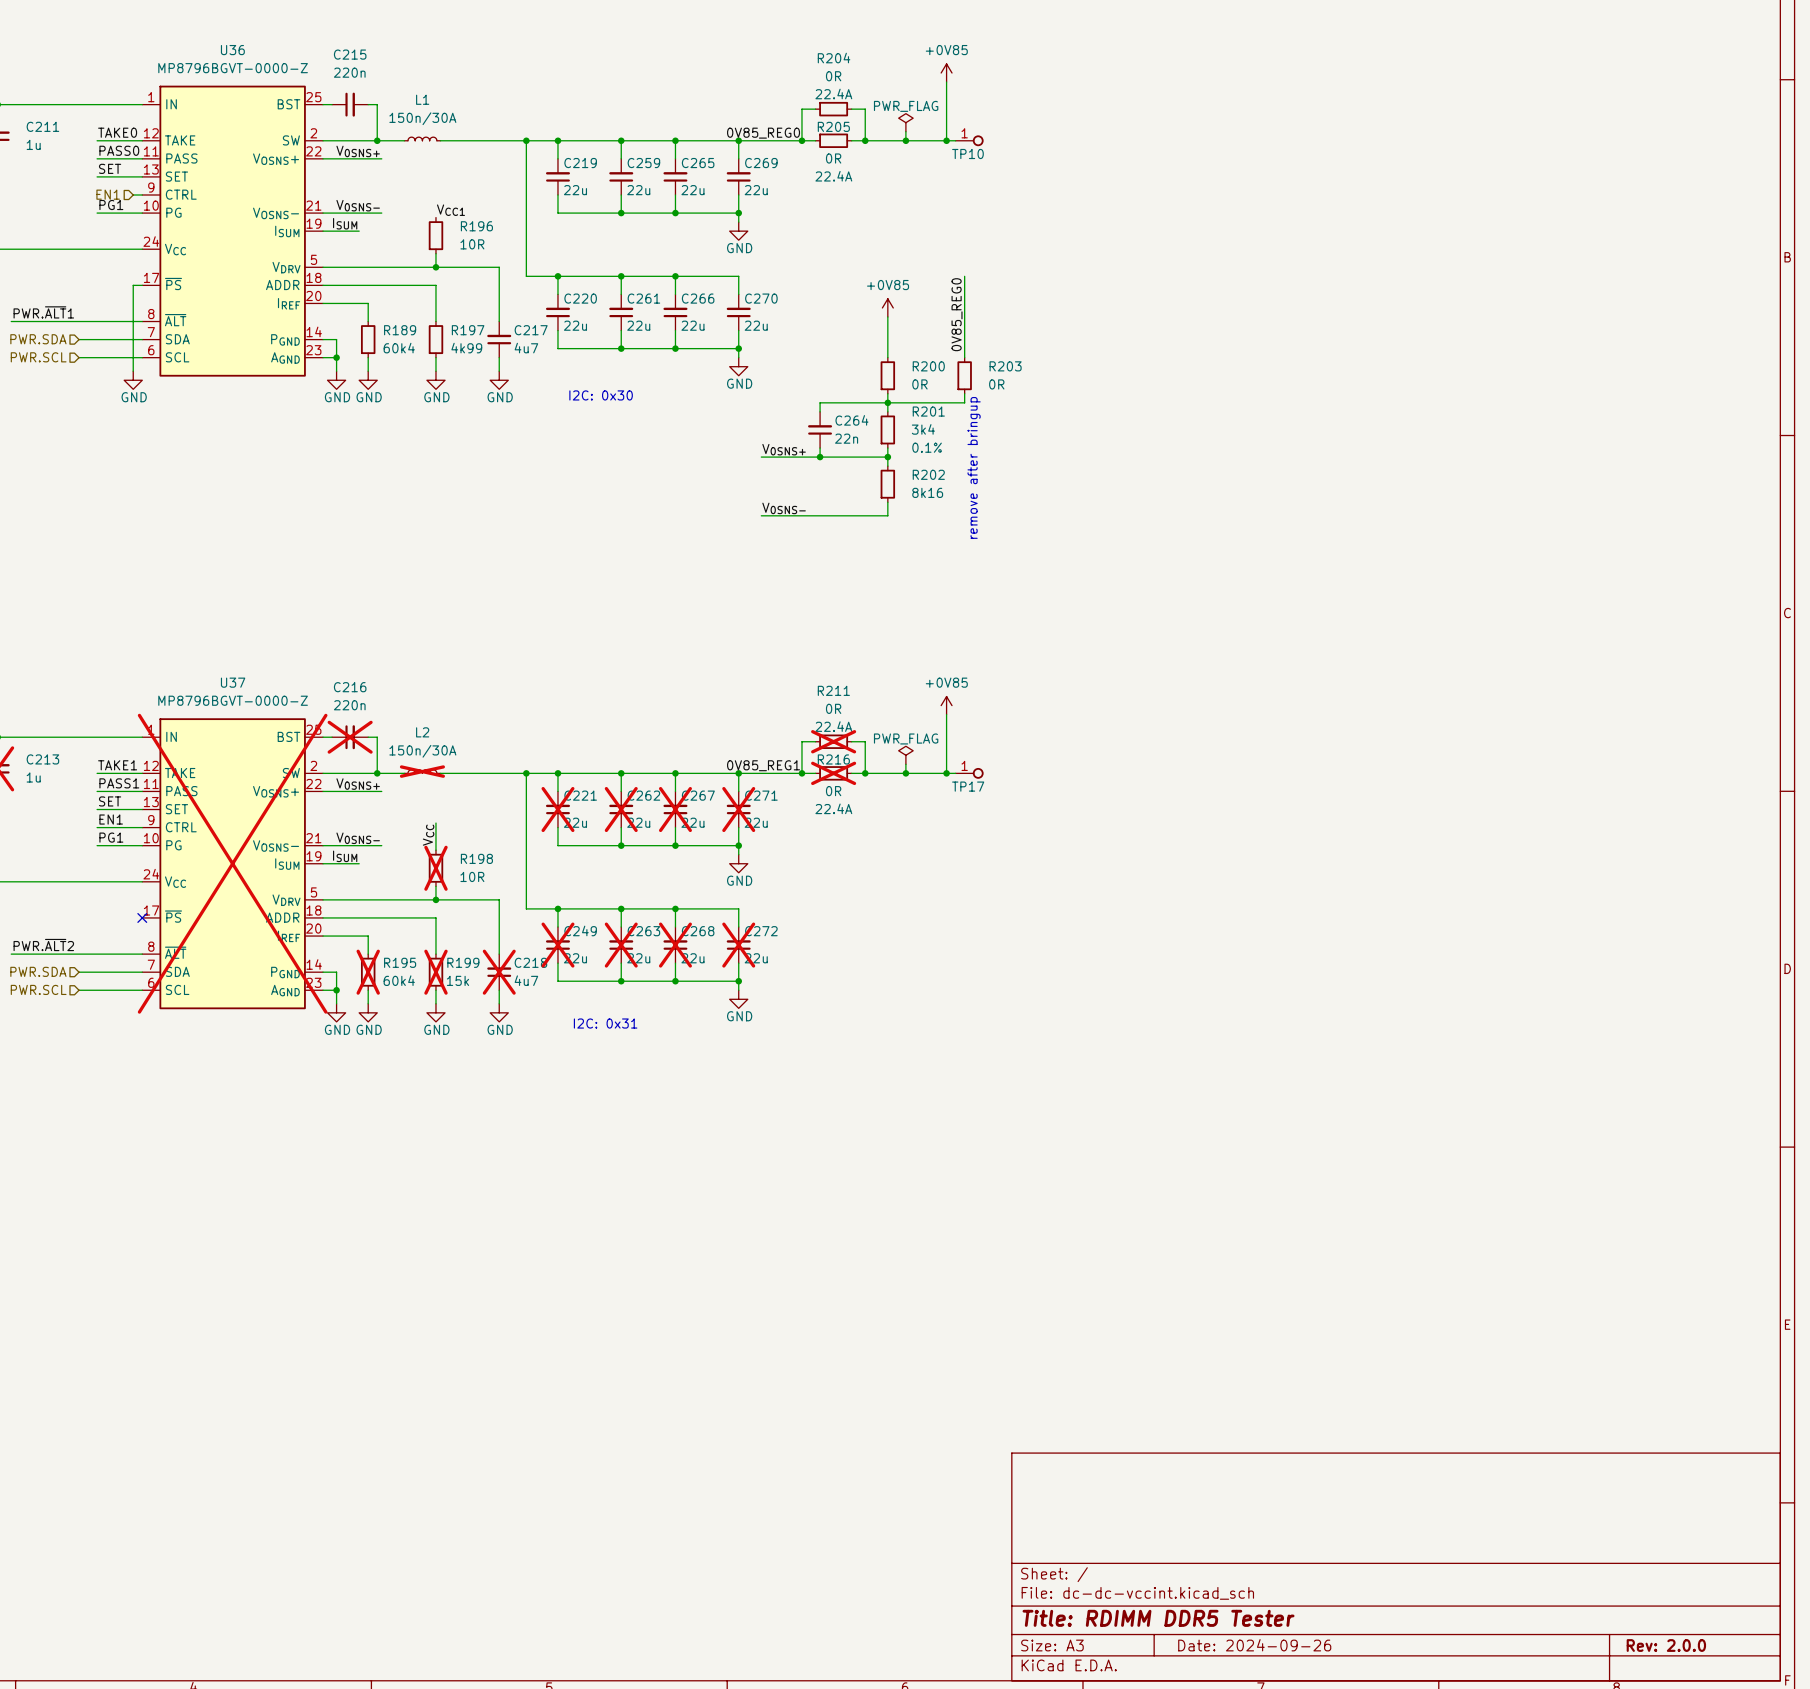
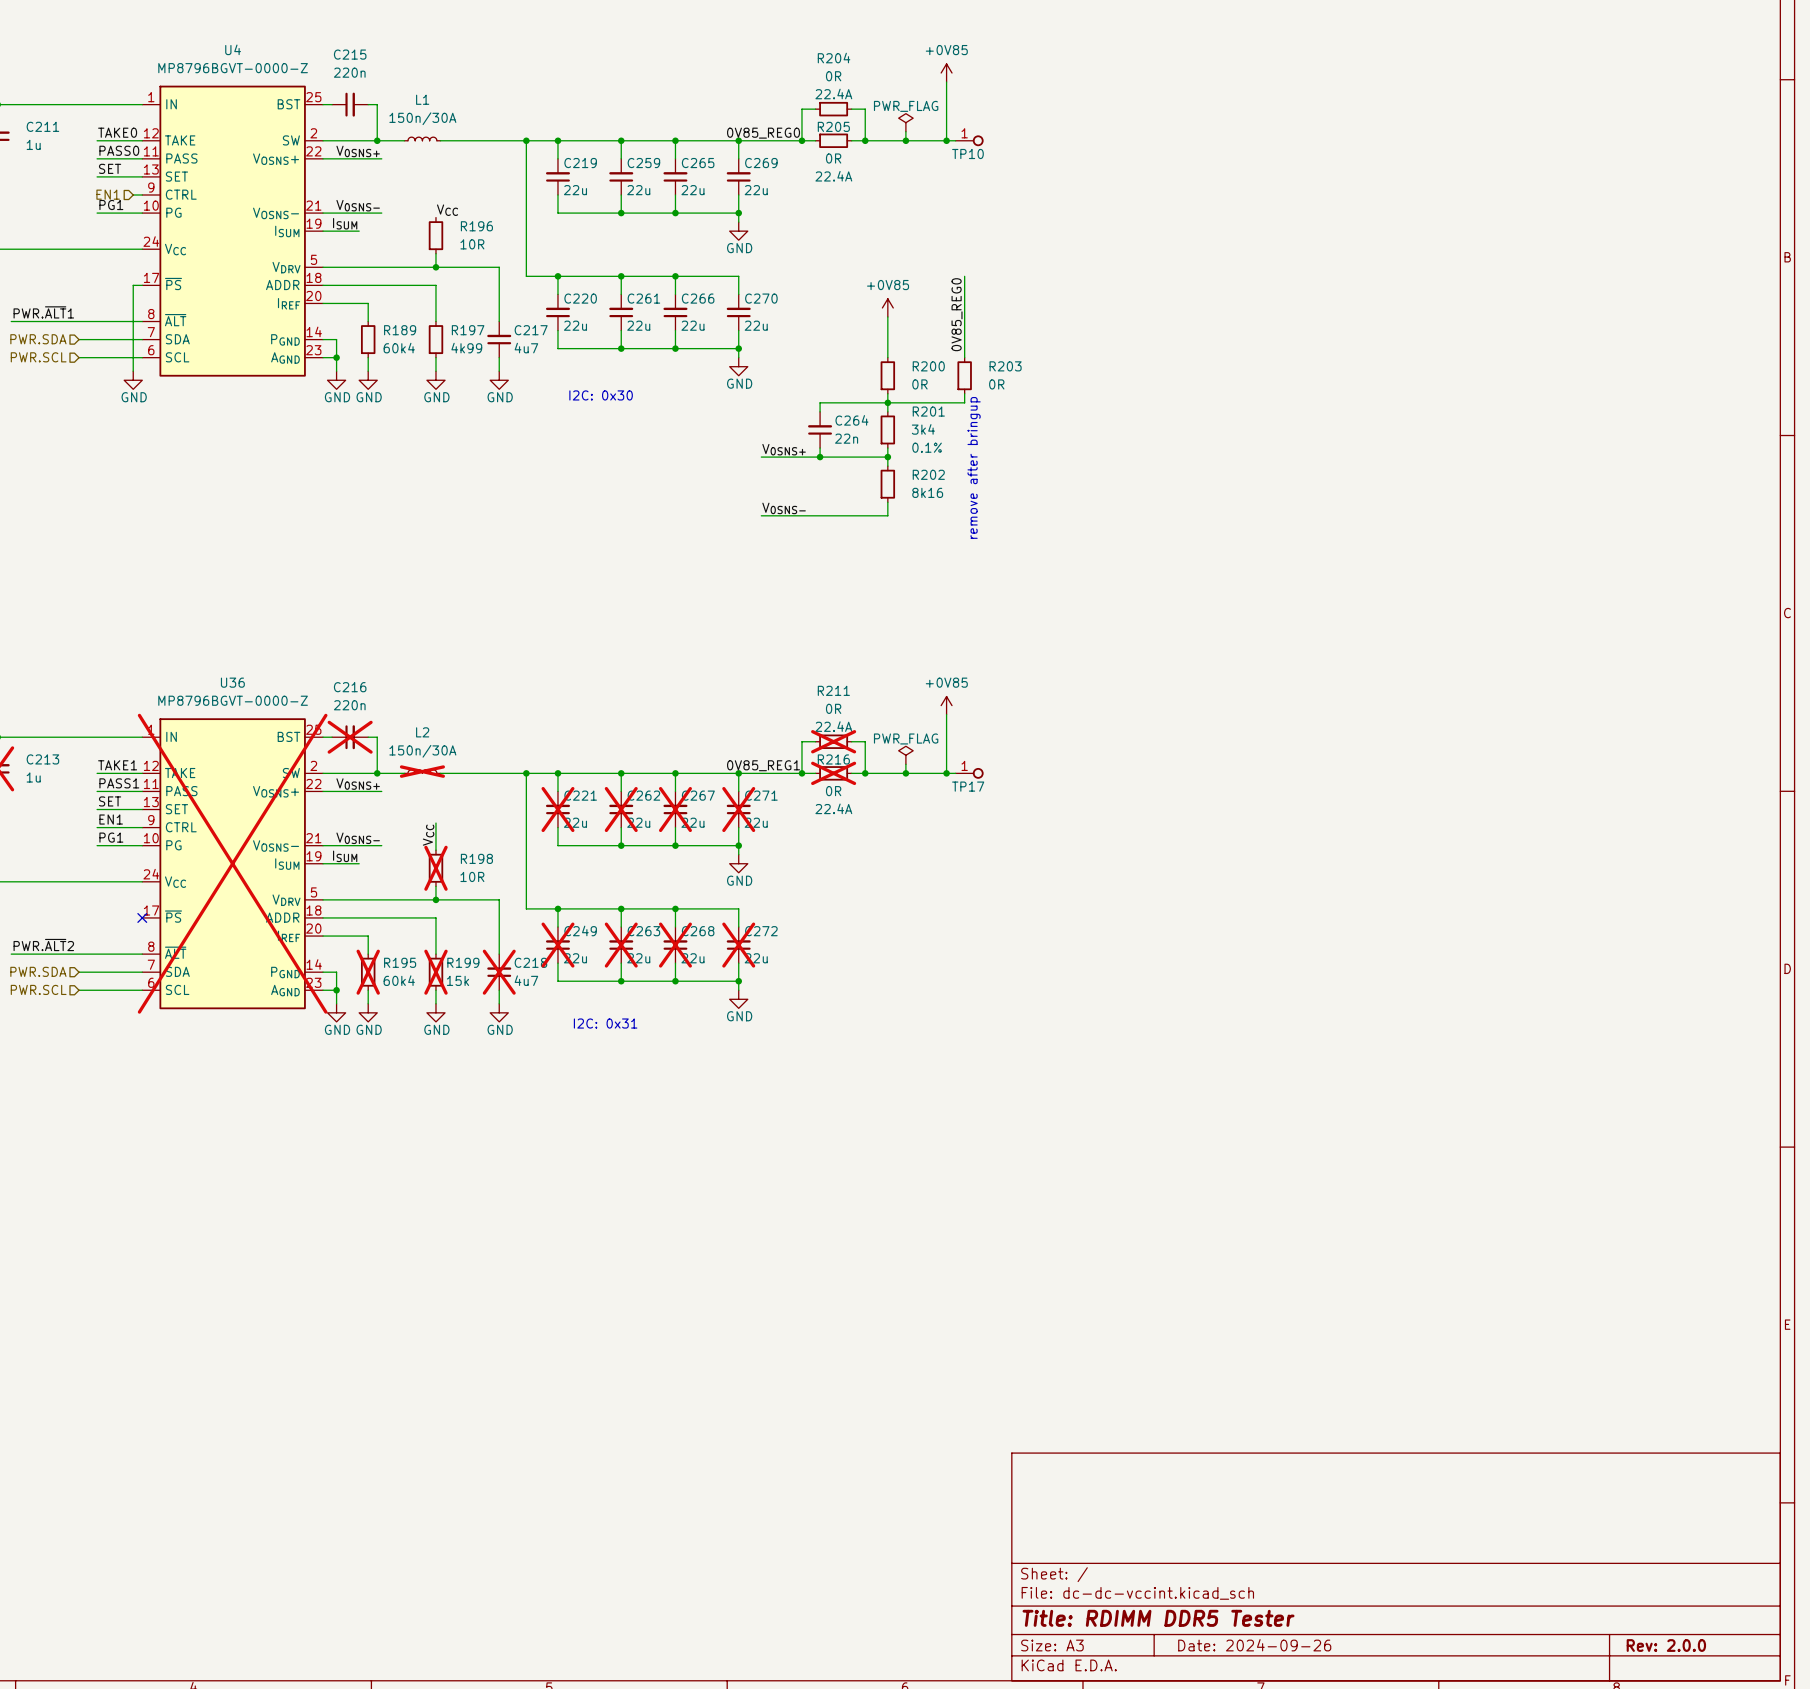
U36 name: U36 (232, 50) -> U4 (233, 49)
label: VCC1 (450, 210) -> VCC (447, 210)
U37 name: U37 (233, 682) -> U36 (232, 682)

